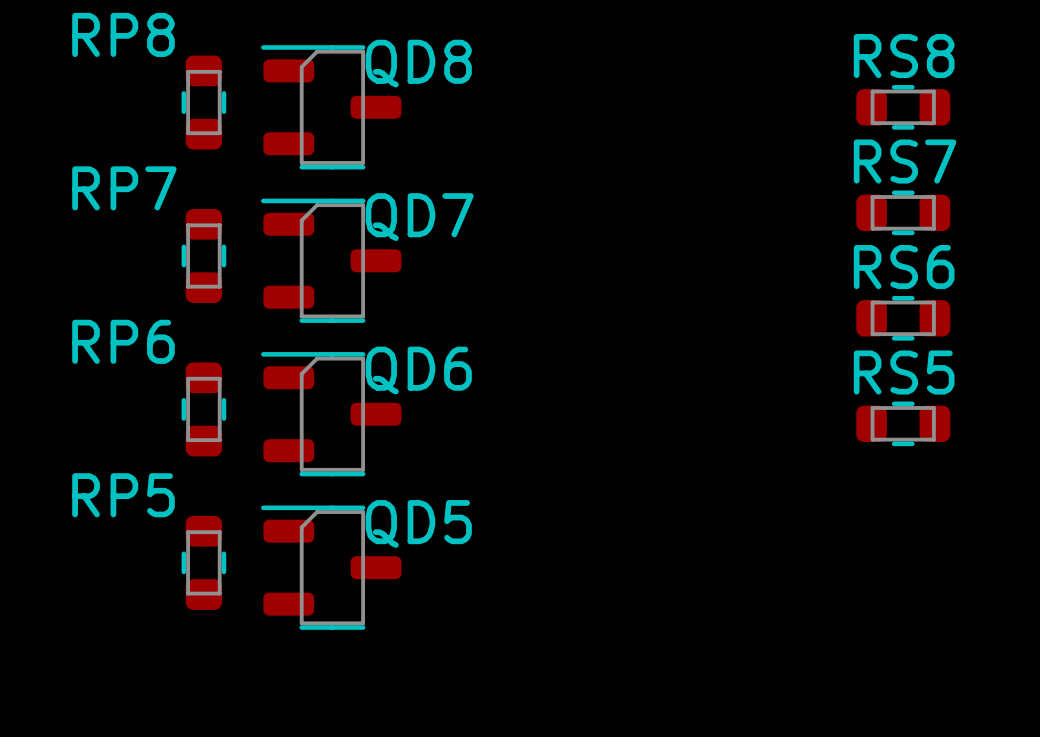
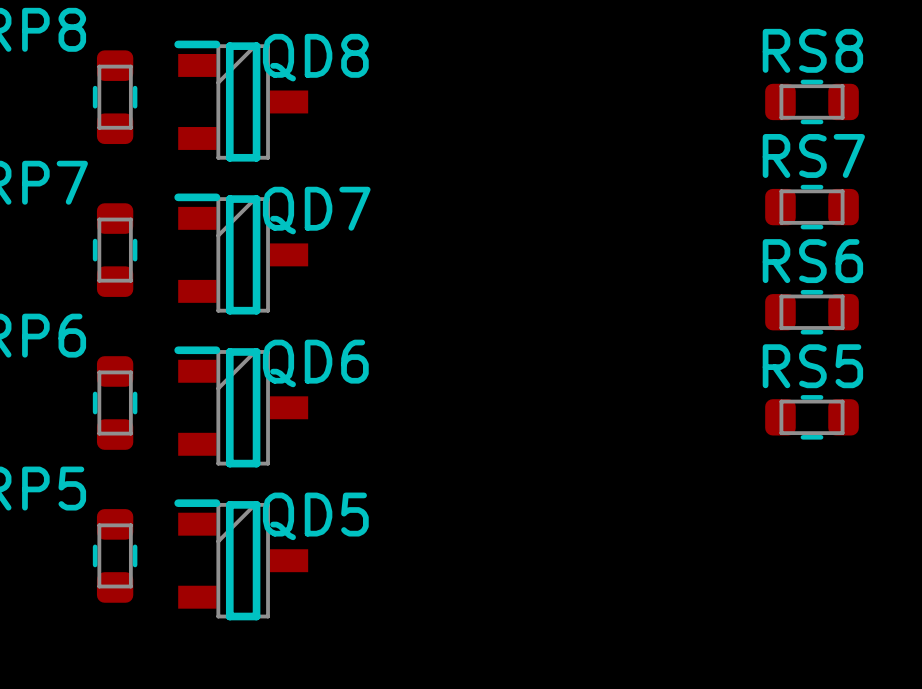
QD8 footprint: [261, 45, 402, 170] -> [174, 40, 309, 162]
QD7 footprint: [261, 198, 402, 323] -> [174, 193, 309, 315]
QD6 footprint: [261, 352, 402, 477] -> [174, 346, 309, 468]
QD5 footprint: [261, 505, 402, 630] -> [174, 499, 309, 621]

